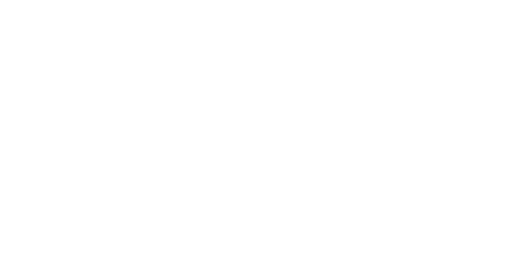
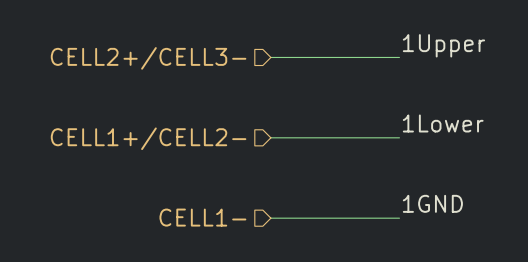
label: none -> 1Upper (443, 45)
hierarchical label: none -> CELL2+/CELL3- (148, 58)
wire: none -> (270, 57) (399, 57)
label: none -> 1Lower (443, 123)
hierarchical label: none -> CELL1+/CELL2- (148, 138)
wire: none -> (270, 137) (399, 137)
label: none -> 1GND (432, 203)
hierarchical label: none -> CELL1- (202, 217)
wire: none -> (270, 218) (399, 218)

